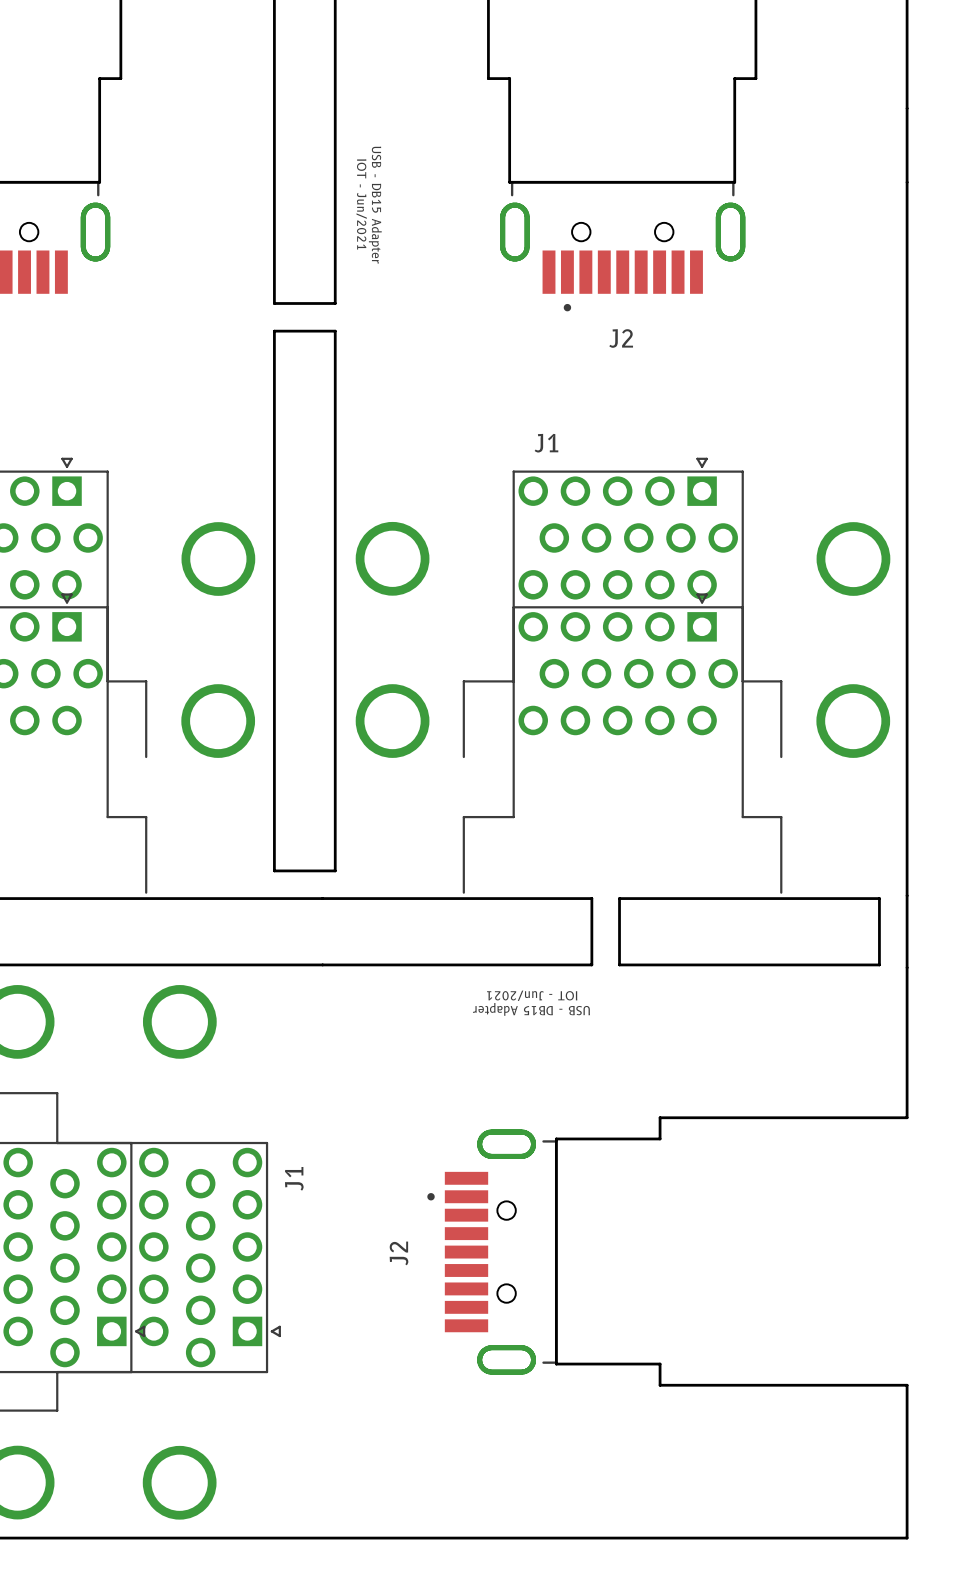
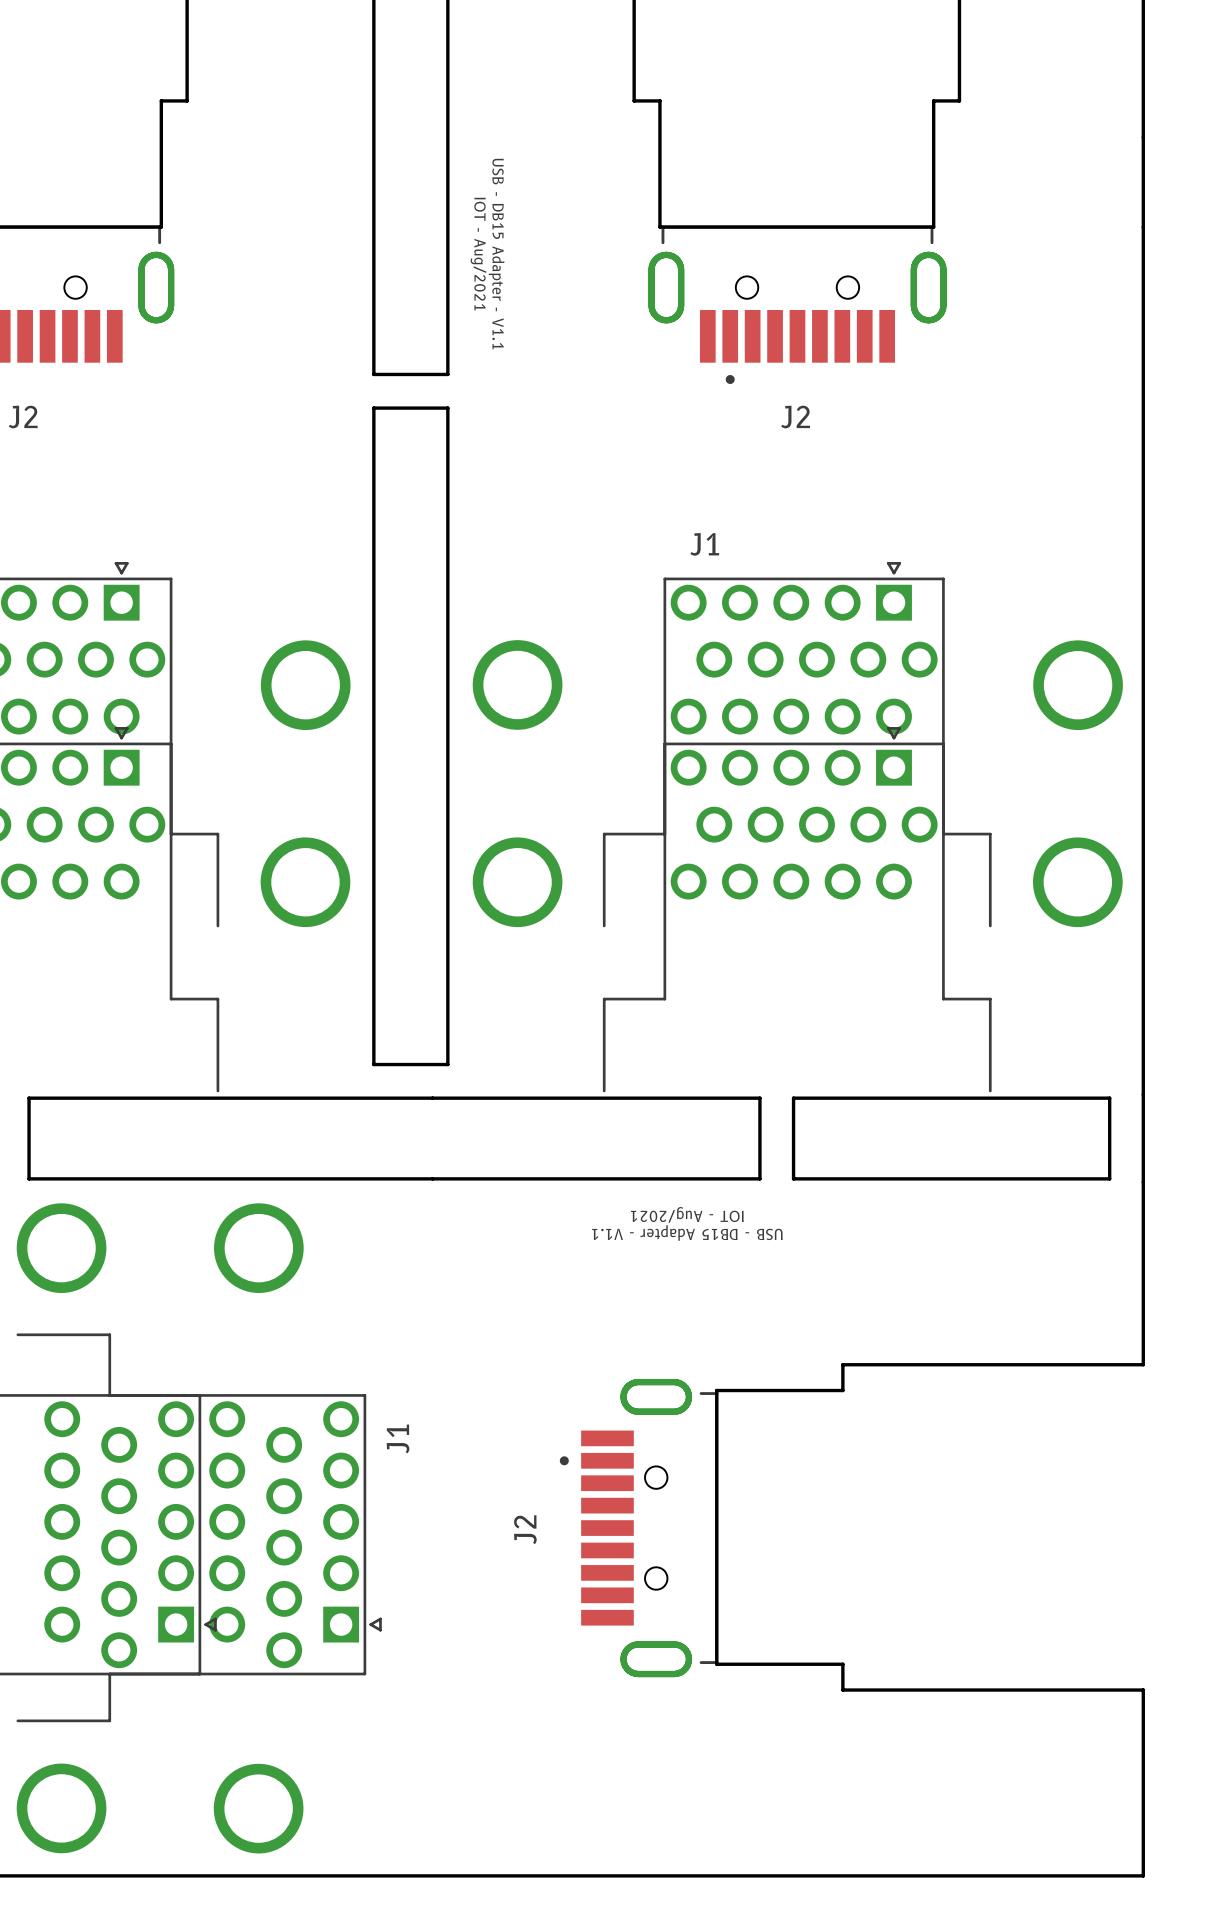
text: IOT - Jun/2021 (361, 204) -> IOT - Aug/2021 (478, 253)
text: USB - DB15 Adapter (375, 205) -> USB - DB15 Adapter - V1.1 (496, 253)
text: IOT - Jun/2021 (532, 995) -> IOT - Aug/2021 (687, 1214)
text: USB - DB15 Adapter (531, 1009) -> USB - DB15 Adapter - V1.1 (687, 1233)

